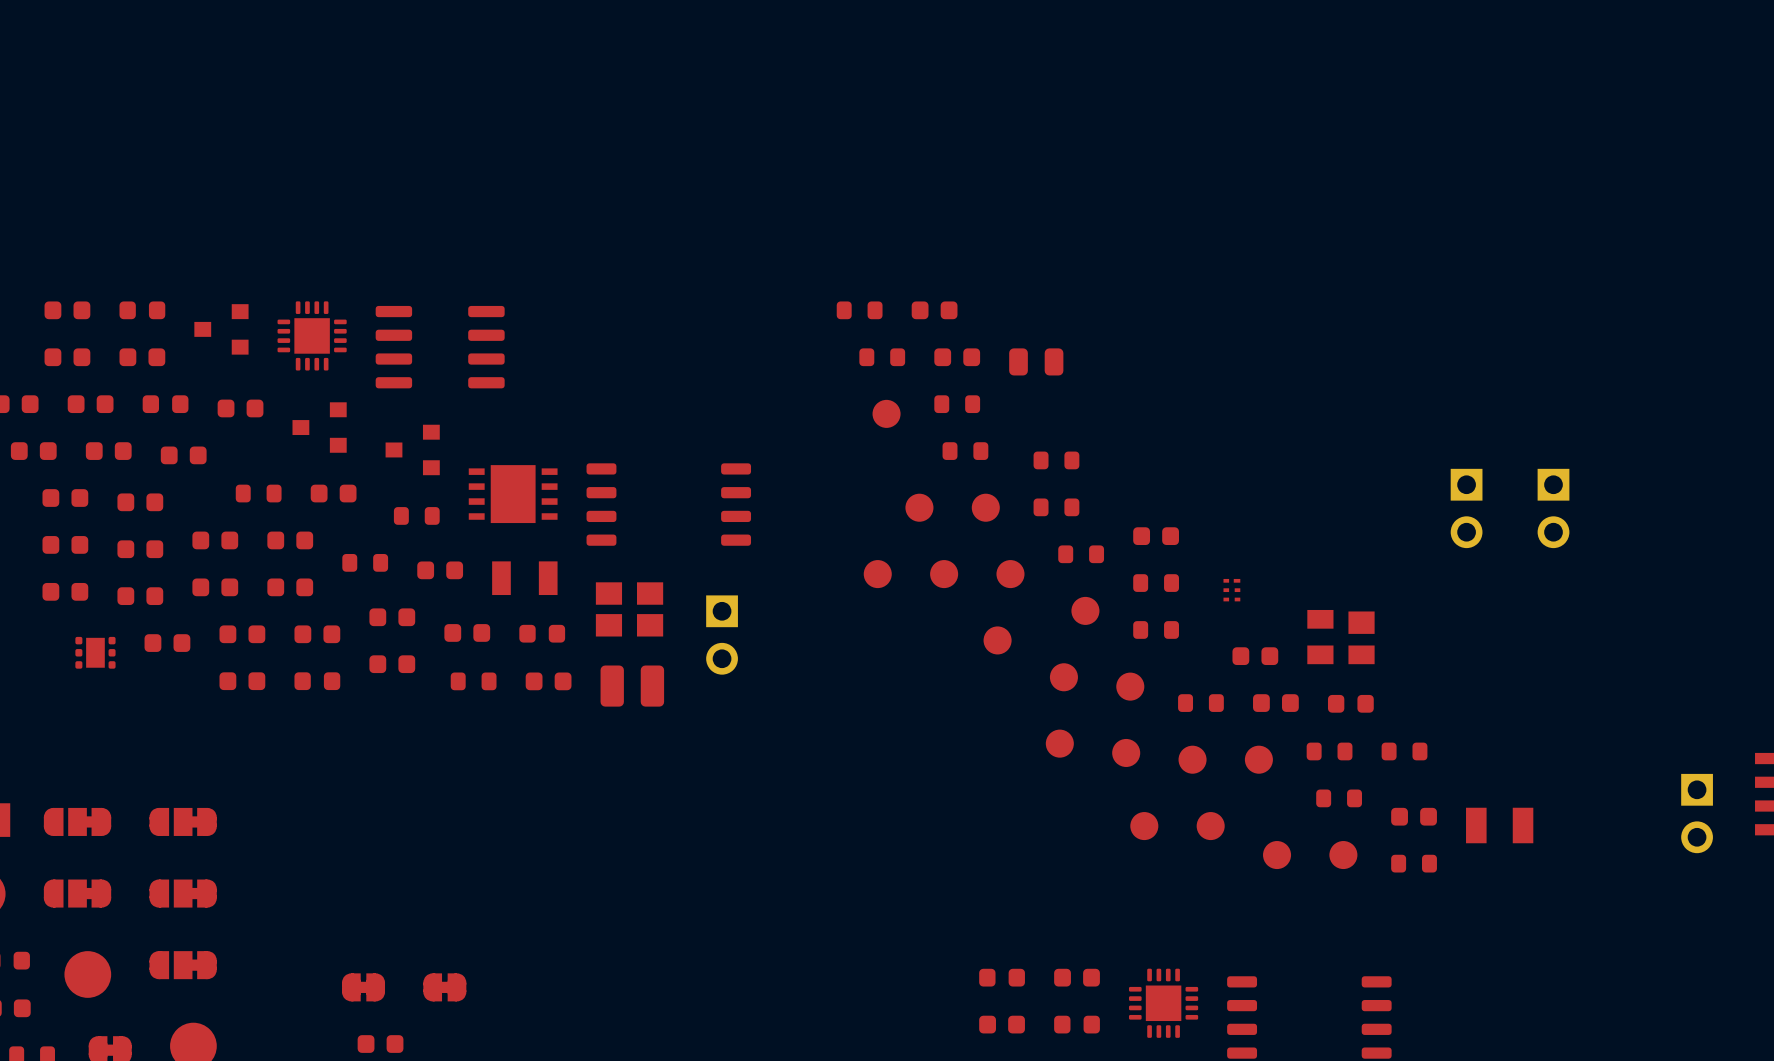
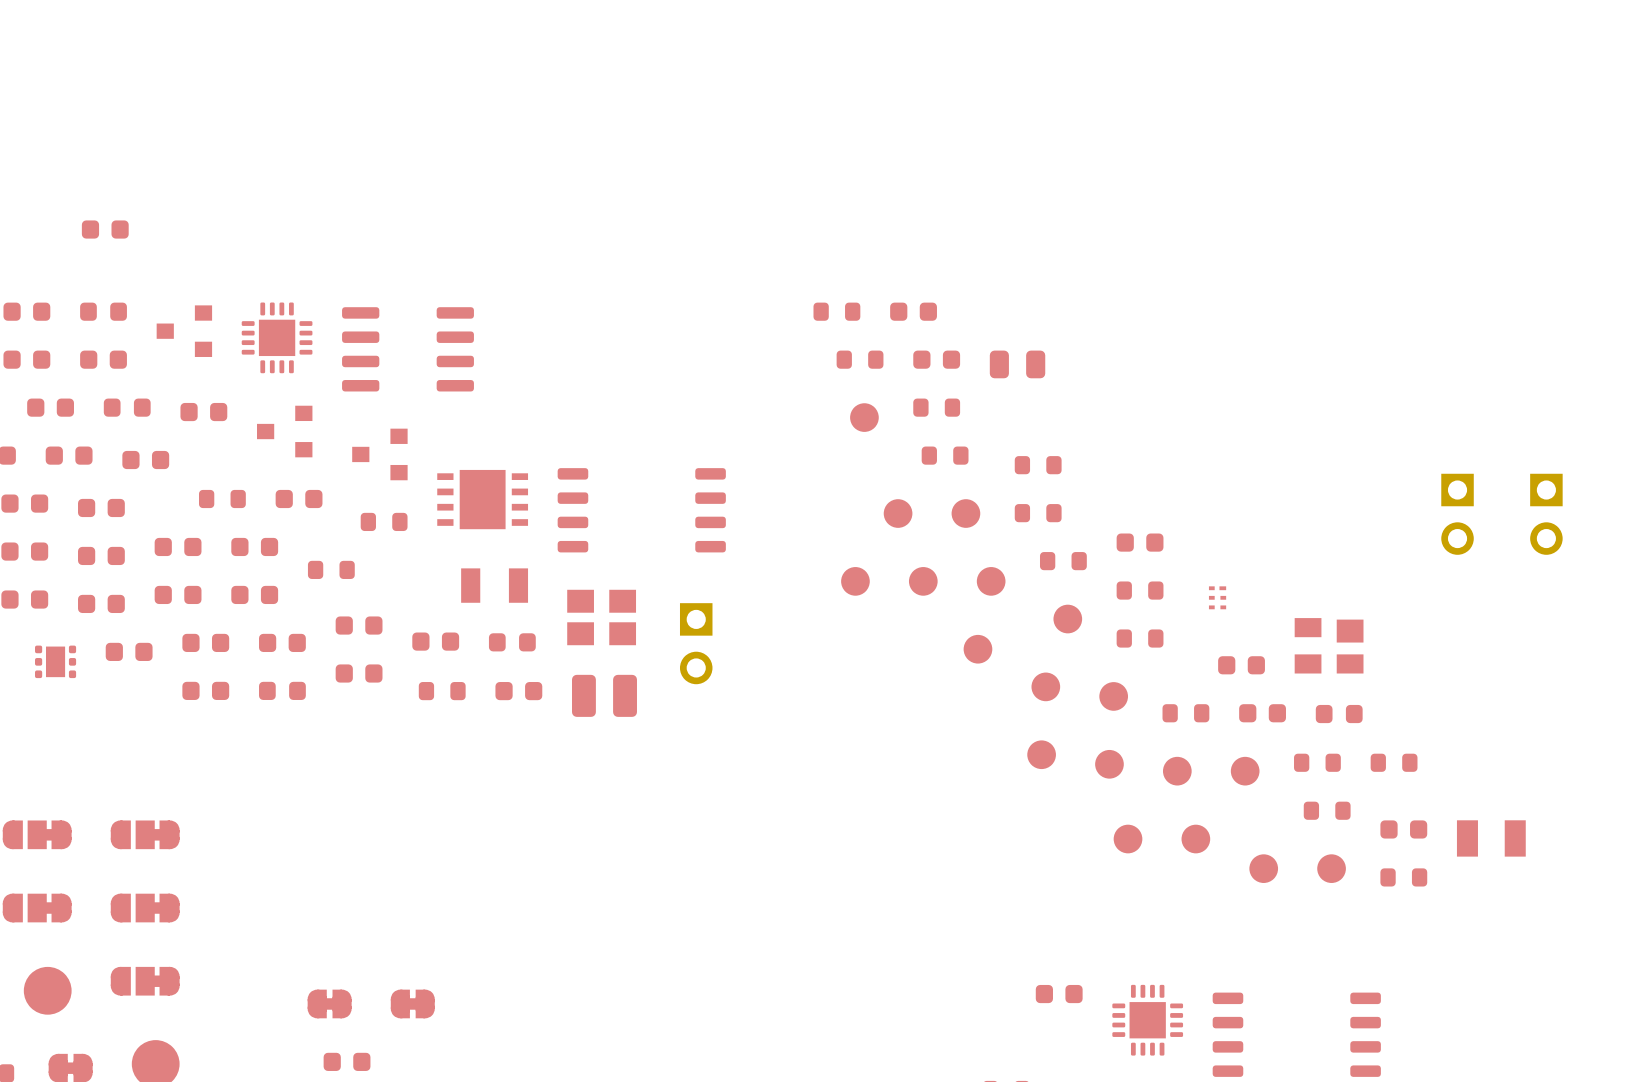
part position: (440, 570) -> (105, 229)
part: (1002, 977) -> none
part: (1002, 1024) -> none
part: (1077, 1024) -> none

